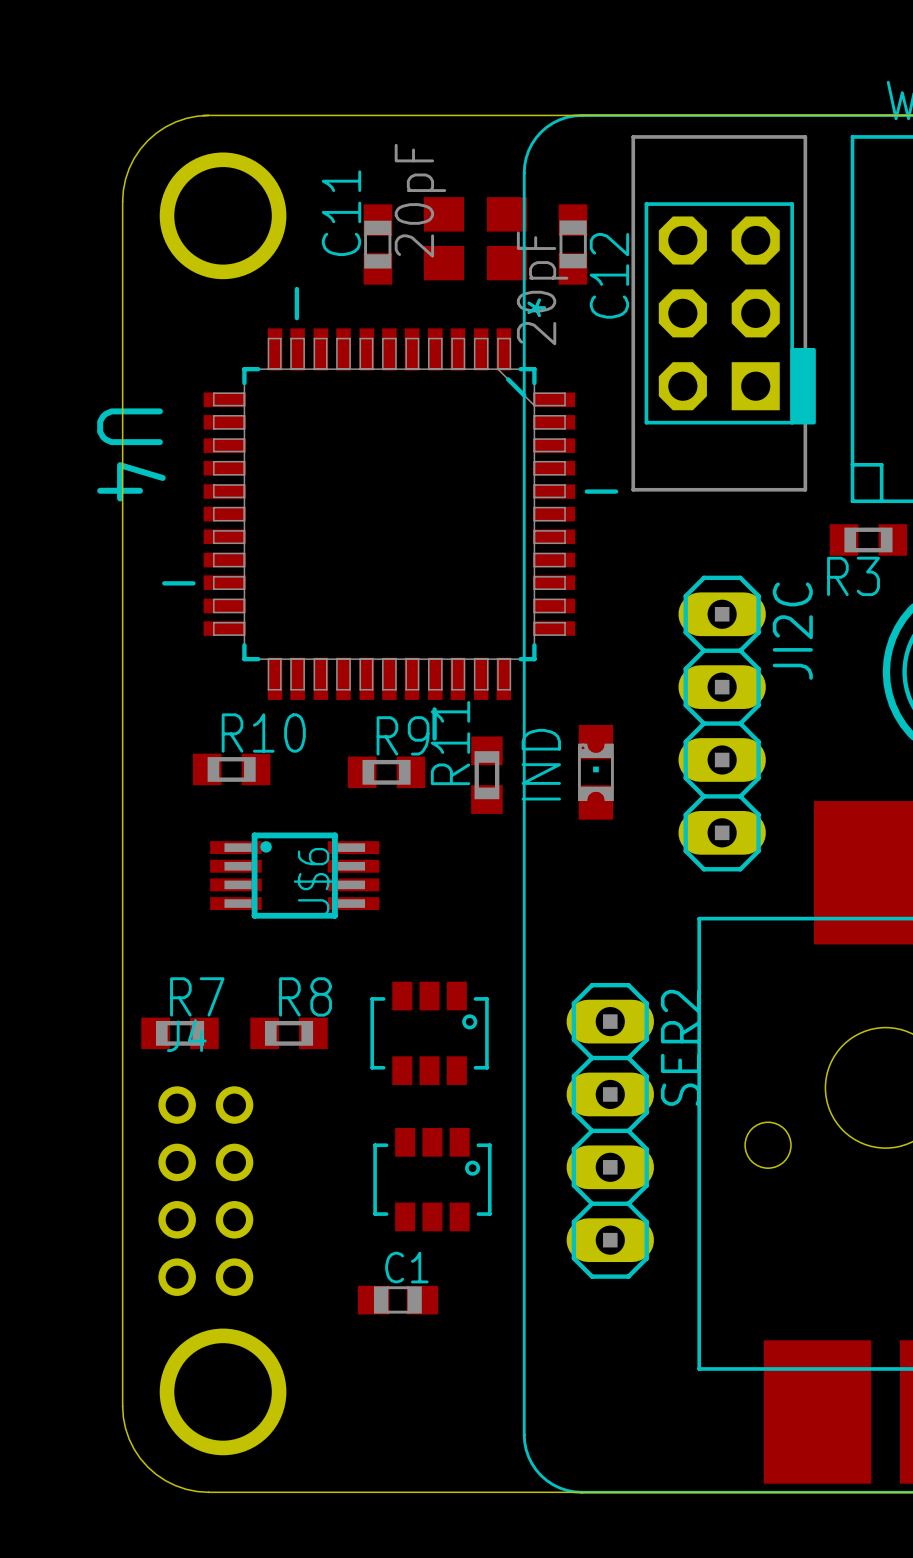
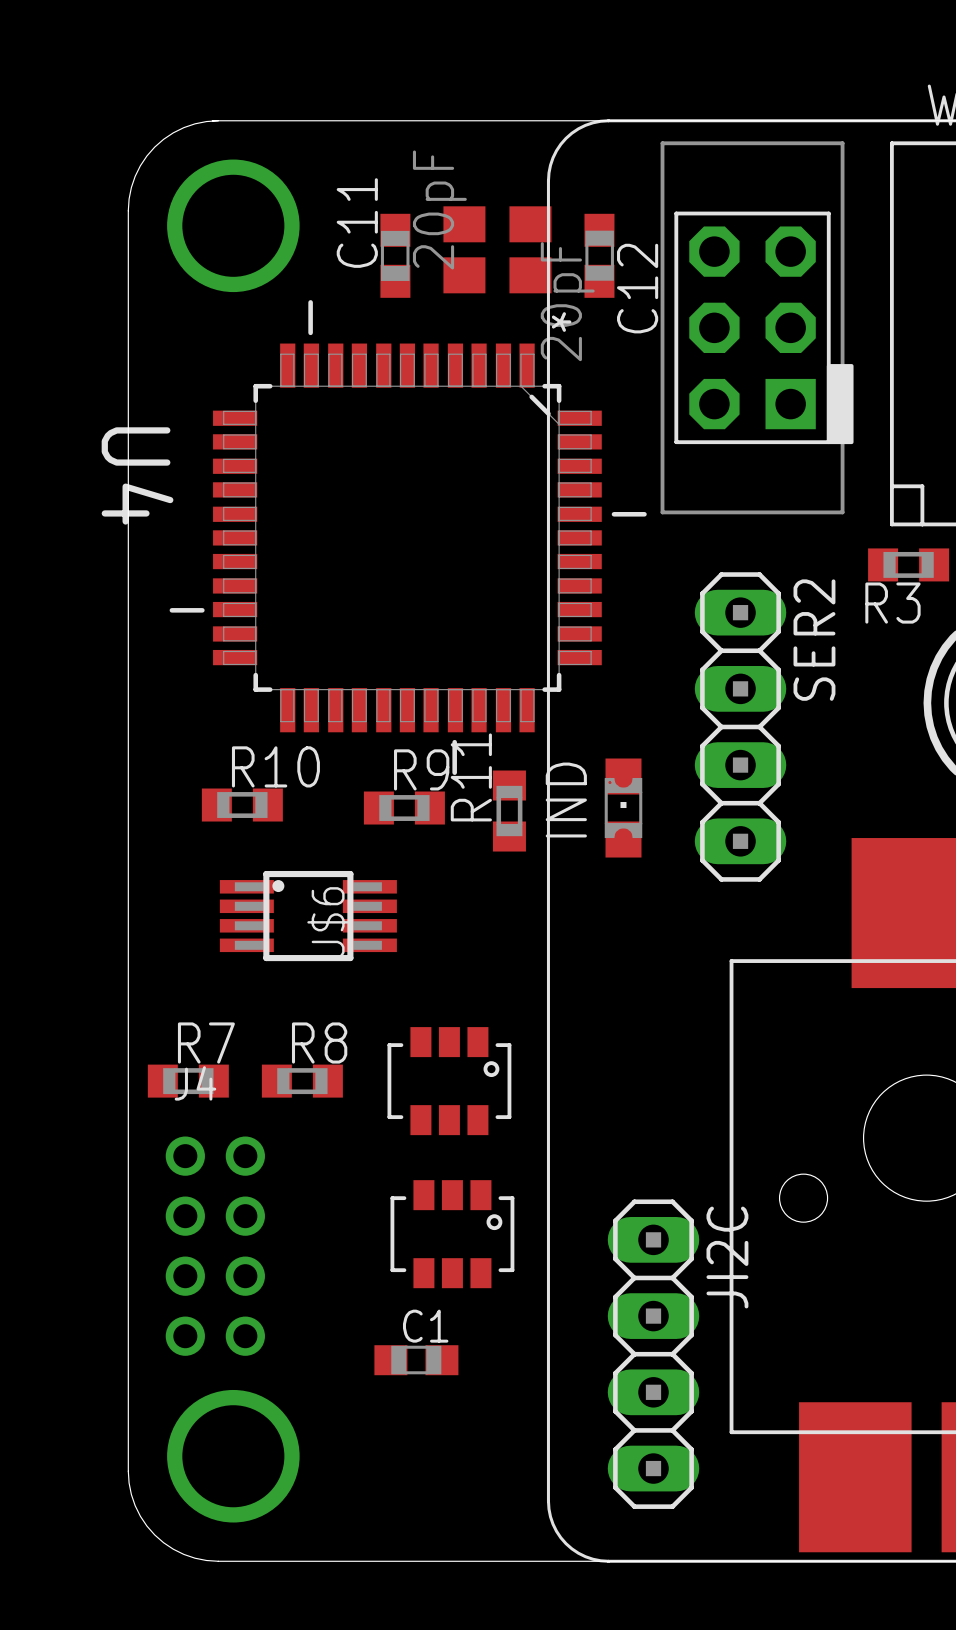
JI2C position: (722, 723) -> (653, 1354)
SER2 position: (610, 1130) -> (740, 726)

